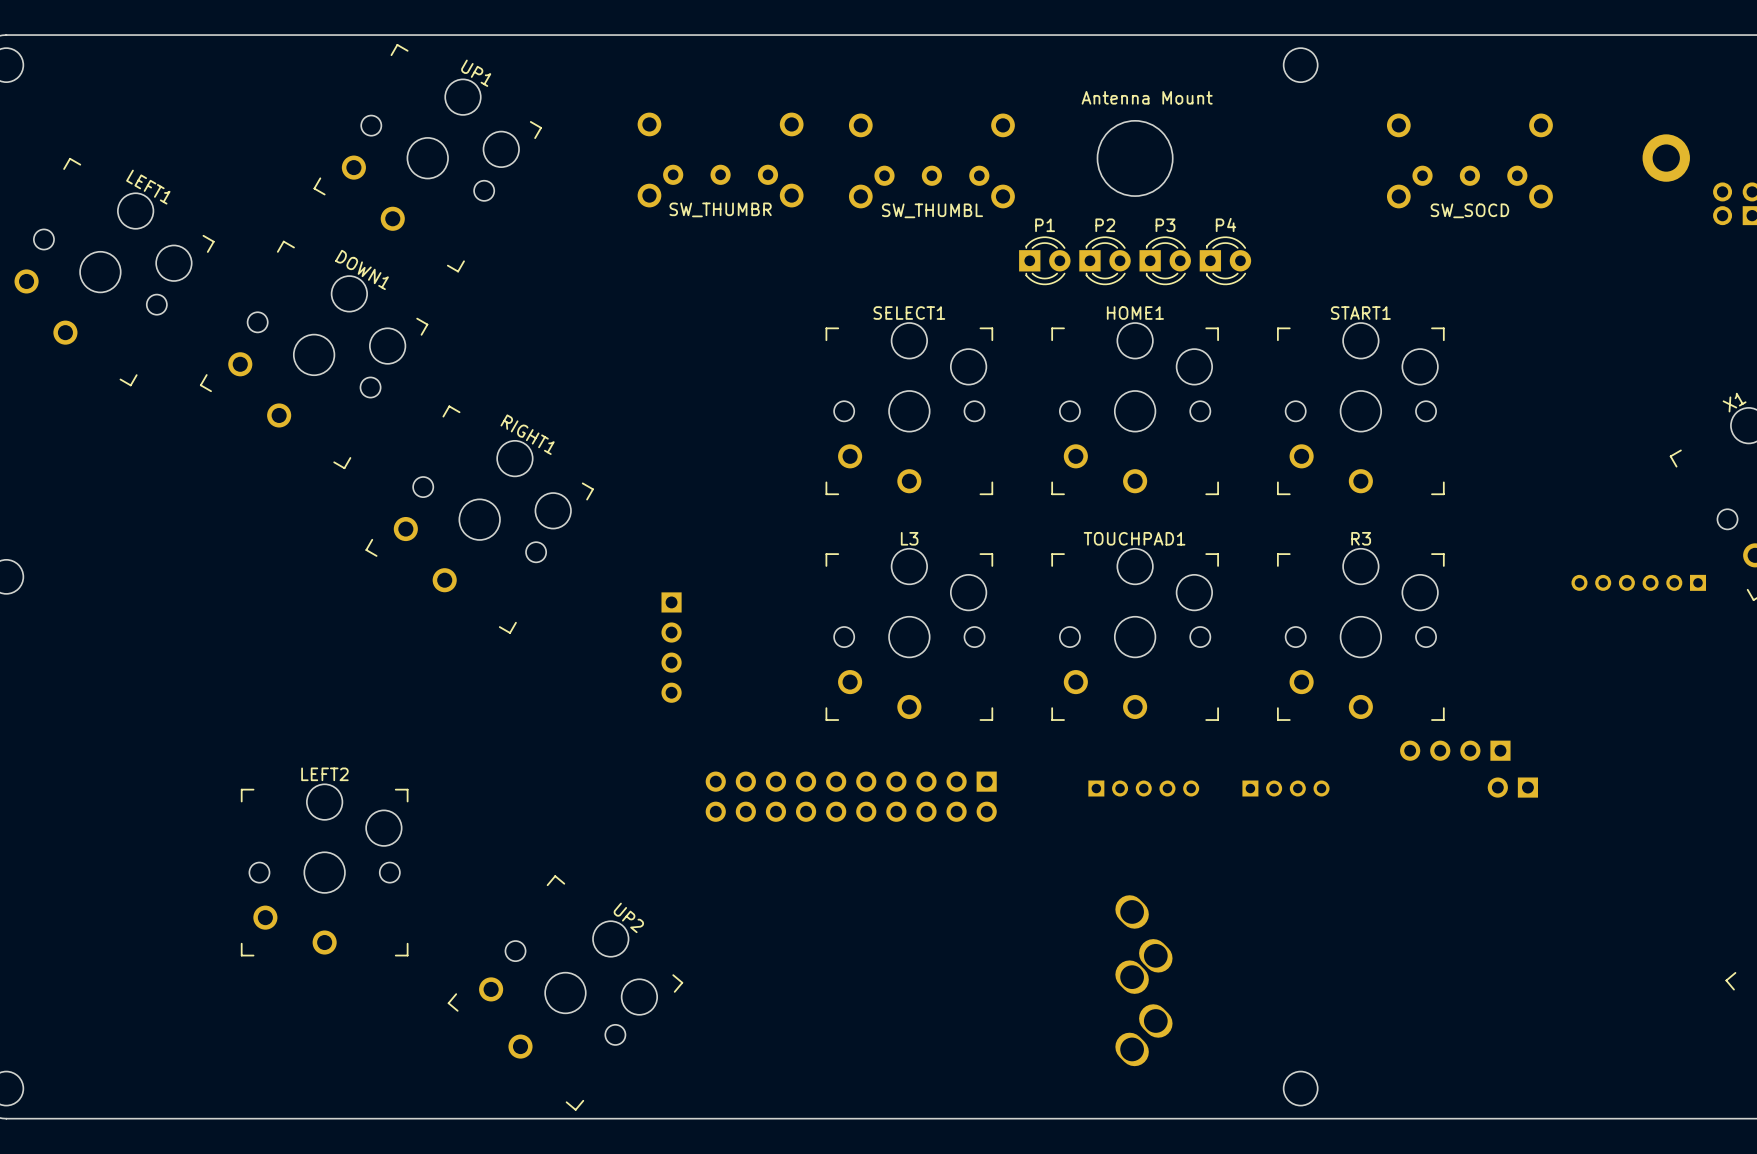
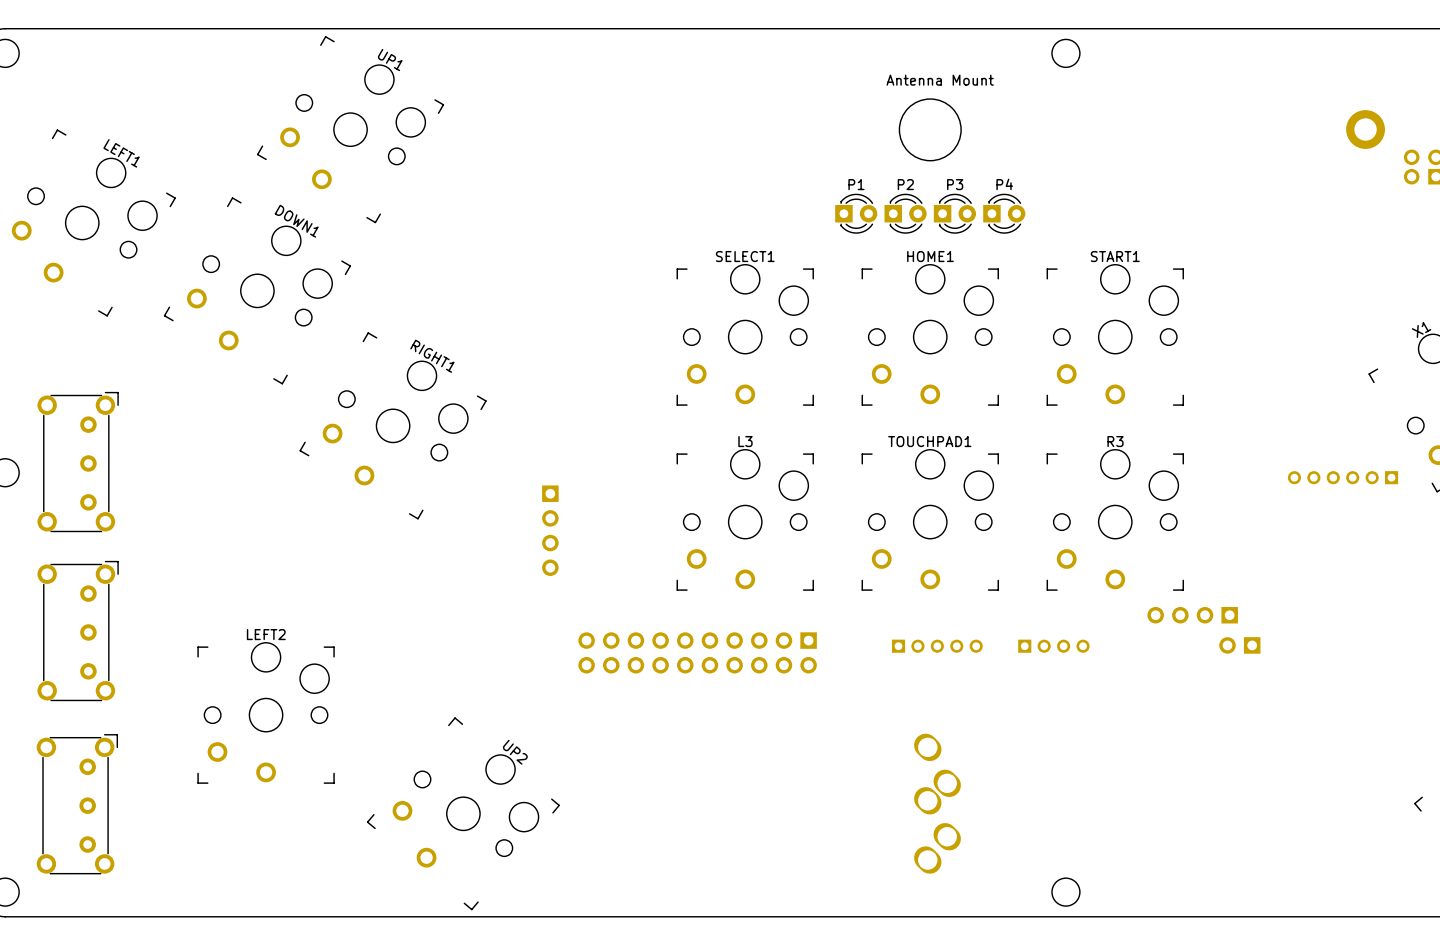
SW_THUMBR: (720, 160) -> none
SW_THUMBL: (931, 160) -> none
SW_SOCD: (1469, 160) -> none
part: none -> (78, 462)
part: none -> (78, 631)
part: none -> (77, 804)

